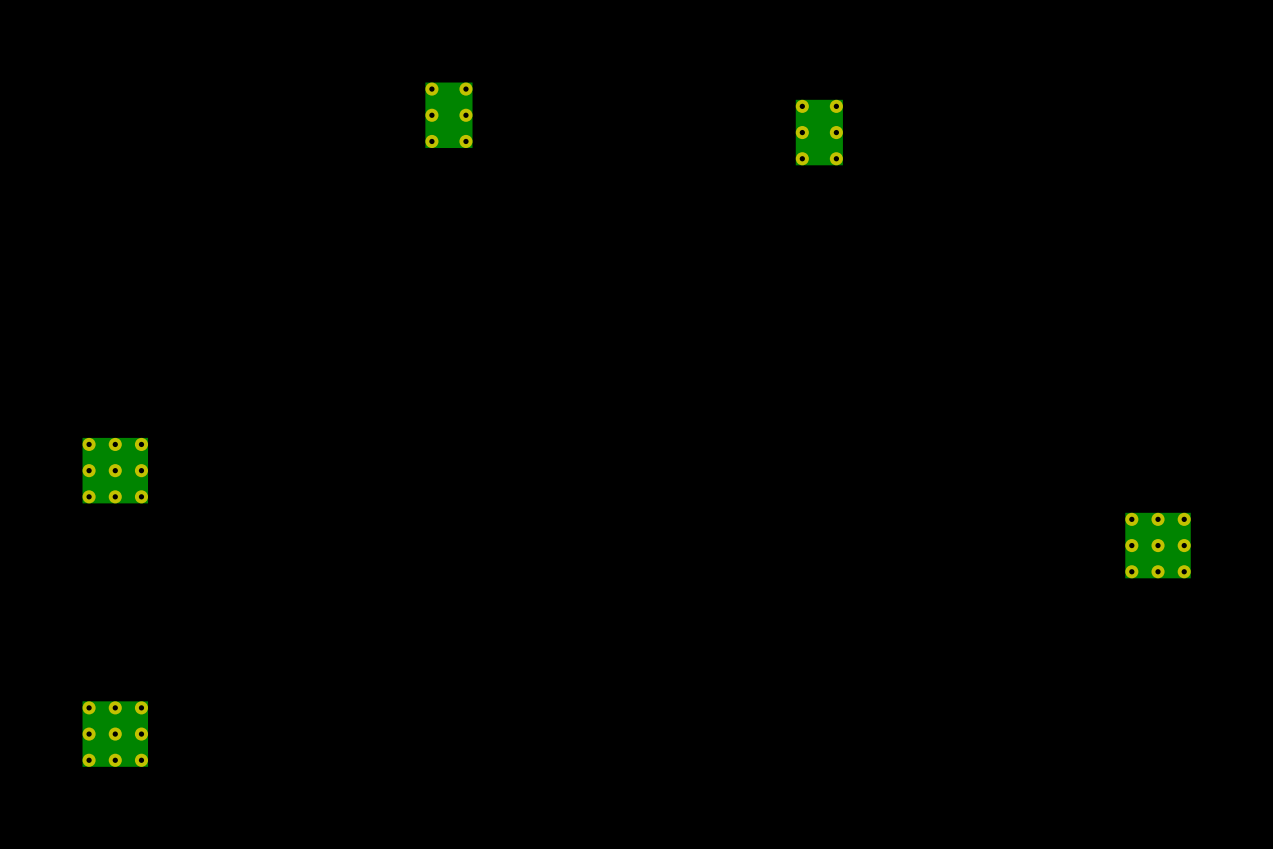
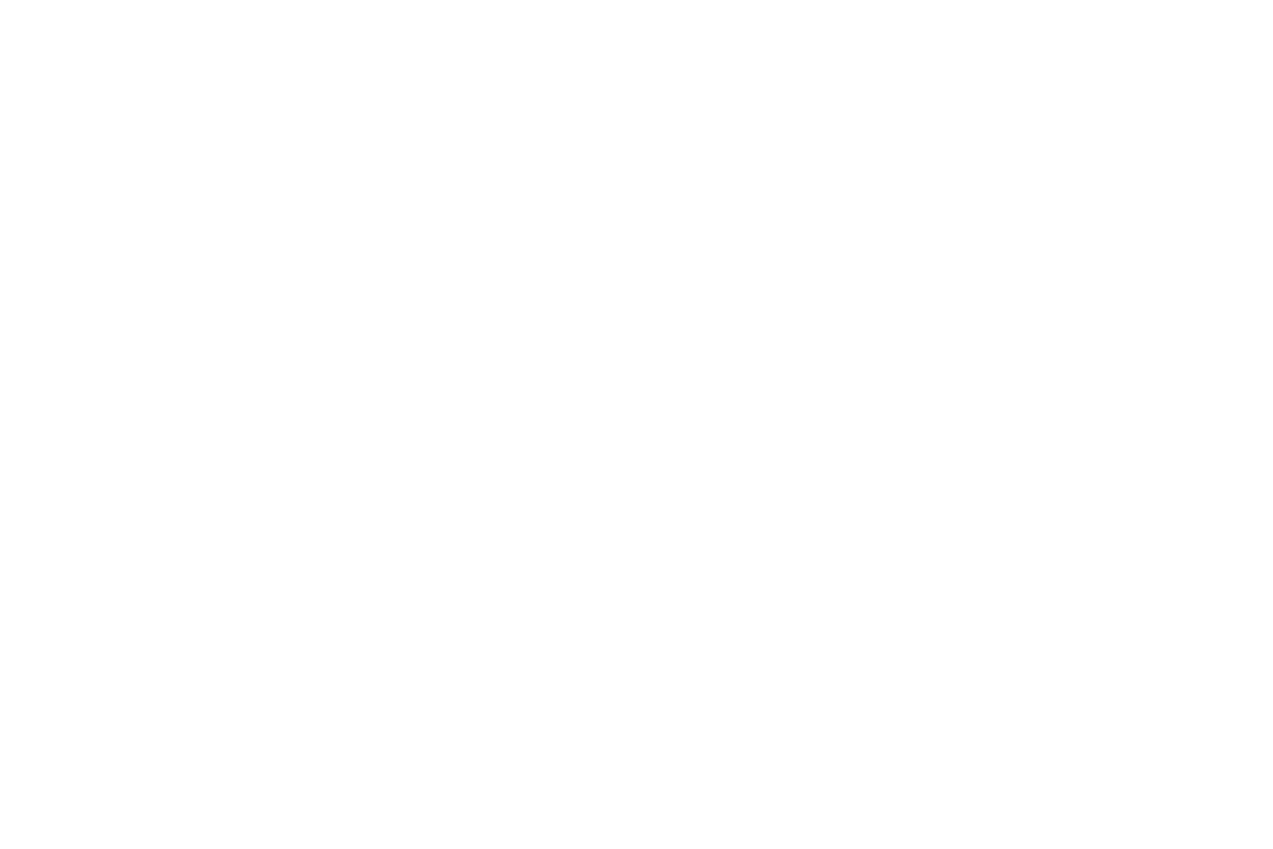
part: (448, 115) -> none
part: (819, 132) -> none
part: (115, 470) -> none
part: (1158, 545) -> none
part: (115, 734) -> none

